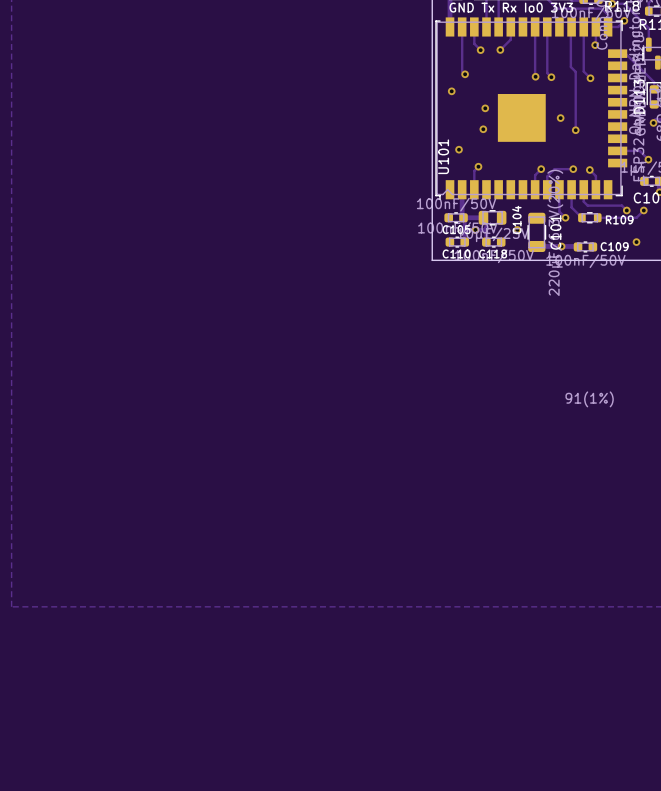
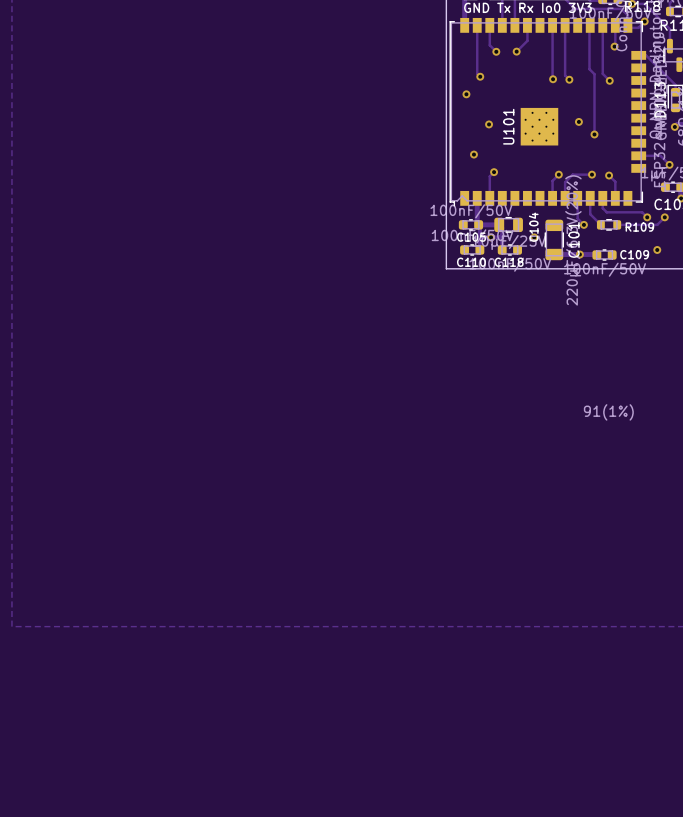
U101 footprint: [435, 17, 628, 200] -> [449, 17, 647, 207]
via: (485, 108) -> none
via: none -> (489, 124)
via: (483, 129) -> none
U101 name position: U101 (443, 156) -> U101 (508, 126)

